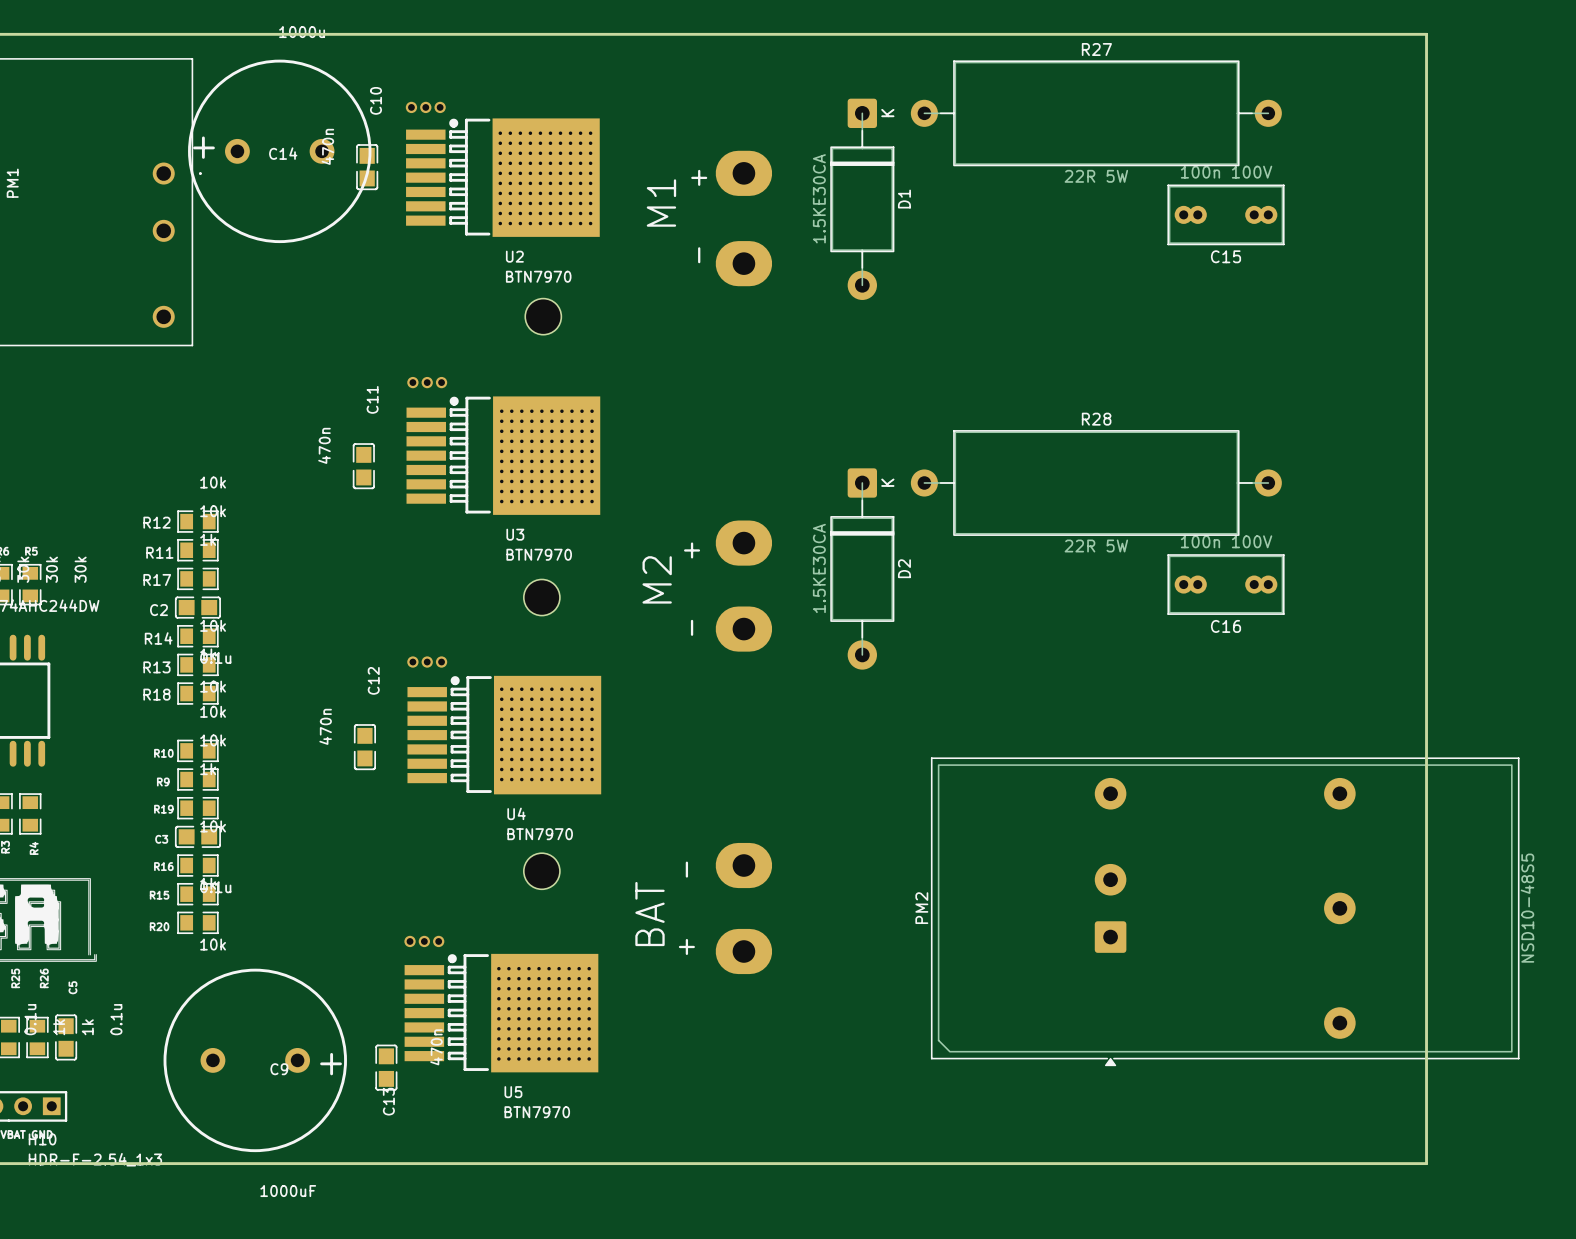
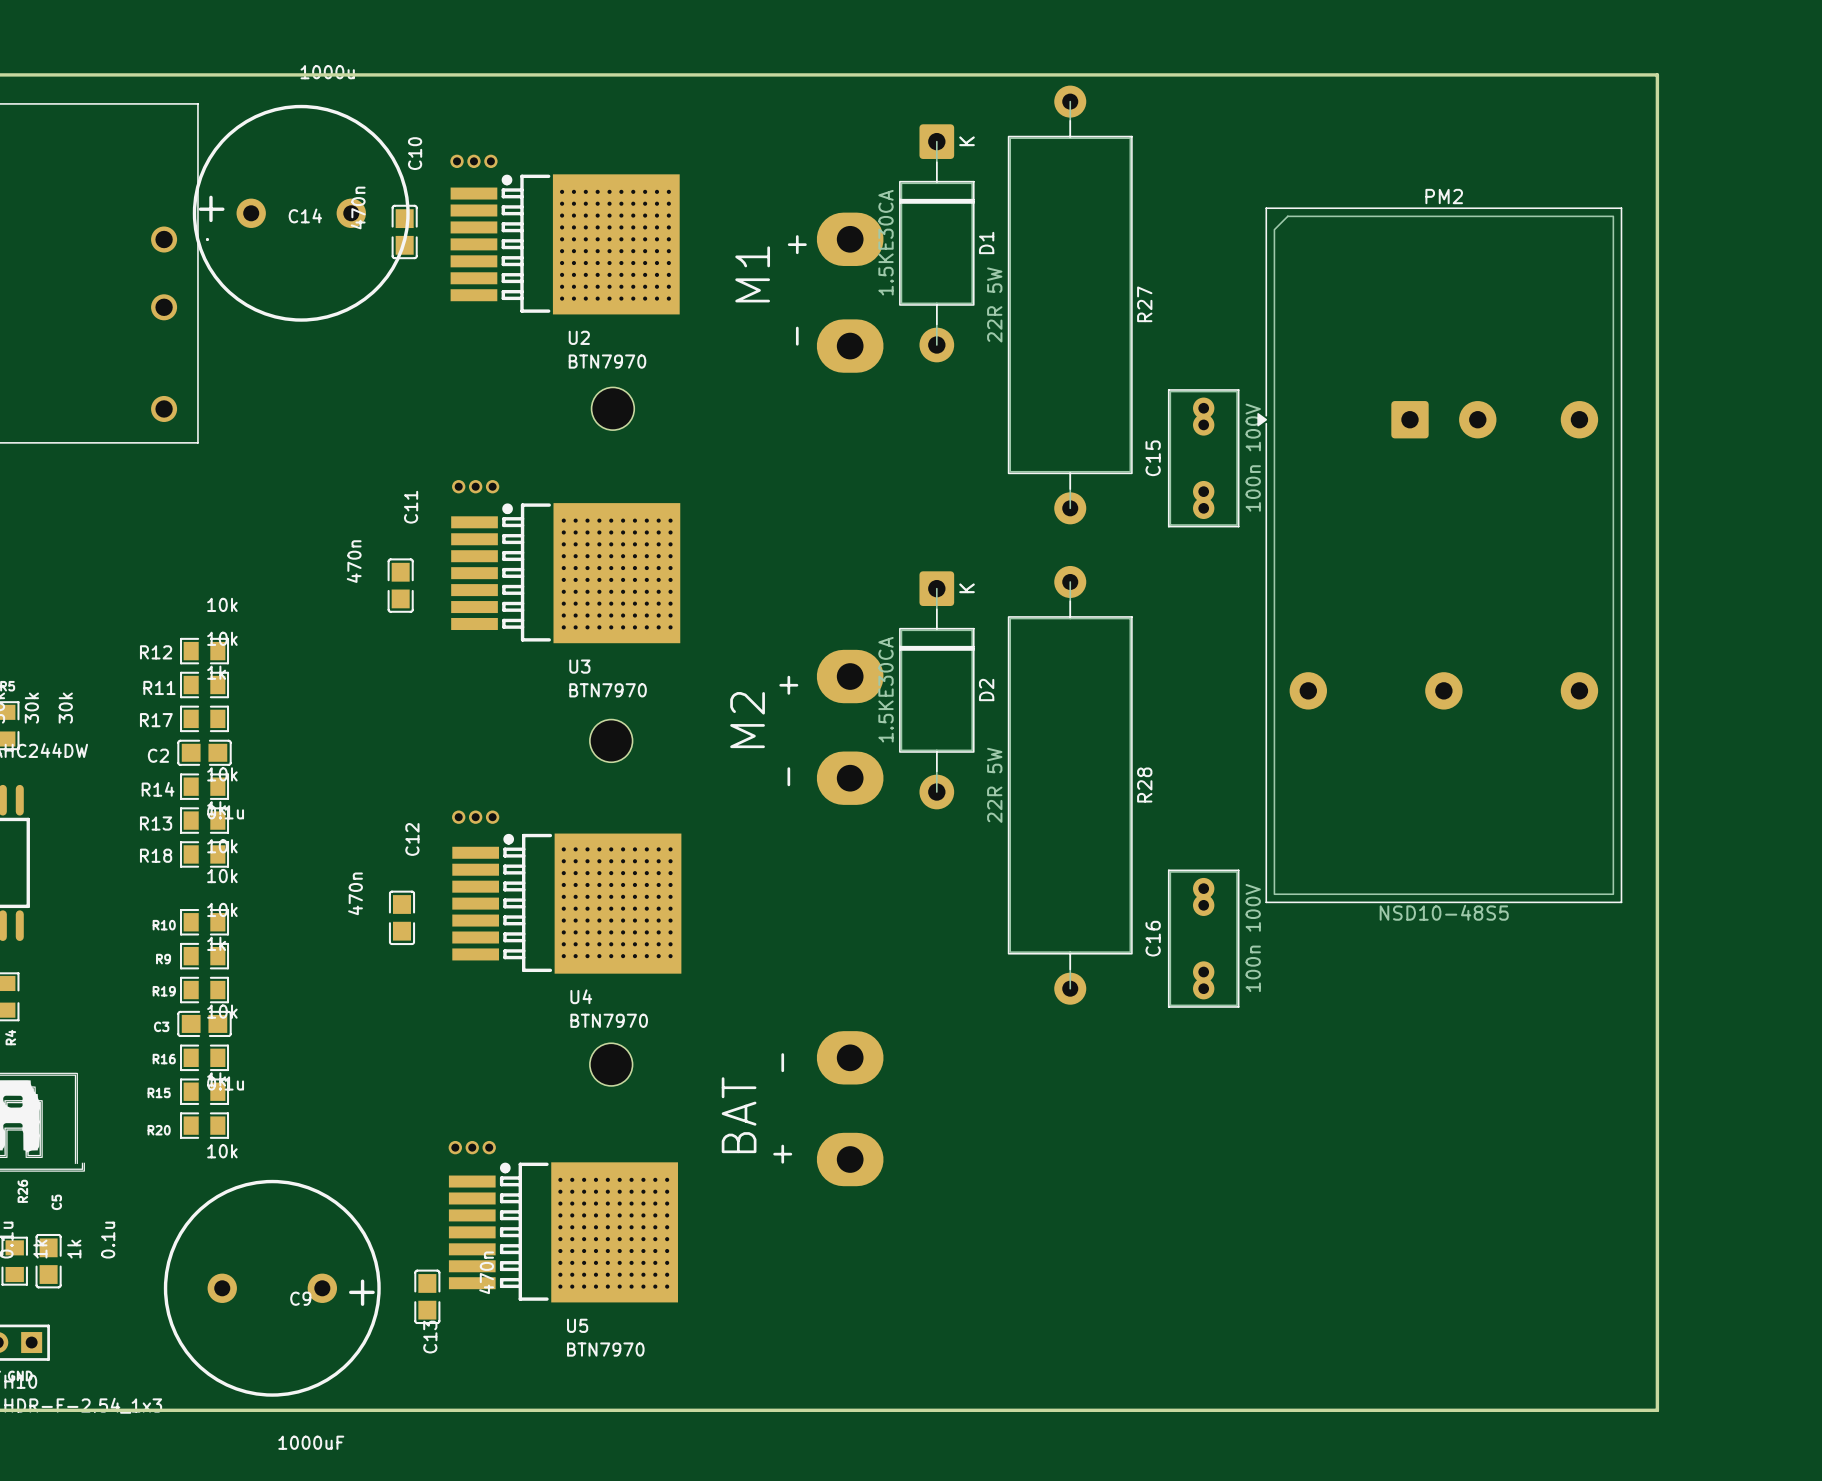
R27 rotation: 0° (1096, 113) -> 90° clockwise (1070, 304)
D1 position: (862, 199) -> (936, 243)
C15 rotation: 0° (1226, 214) -> 90° clockwise (1203, 458)
C15 position: (1226, 214) -> (1203, 458)
R28 rotation: 0° (1096, 482) -> 90° clockwise (1070, 785)
R28 position: (1096, 482) -> (1070, 785)
D2 position: (862, 568) -> (936, 690)
C16 rotation: 0° (1226, 584) -> 90° clockwise (1203, 938)
C16 position: (1226, 584) -> (1203, 938)
PM2 rotation: 0° (1225, 911) -> 90° clockwise (1439, 555)
PM2 position: (1225, 911) -> (1439, 555)

